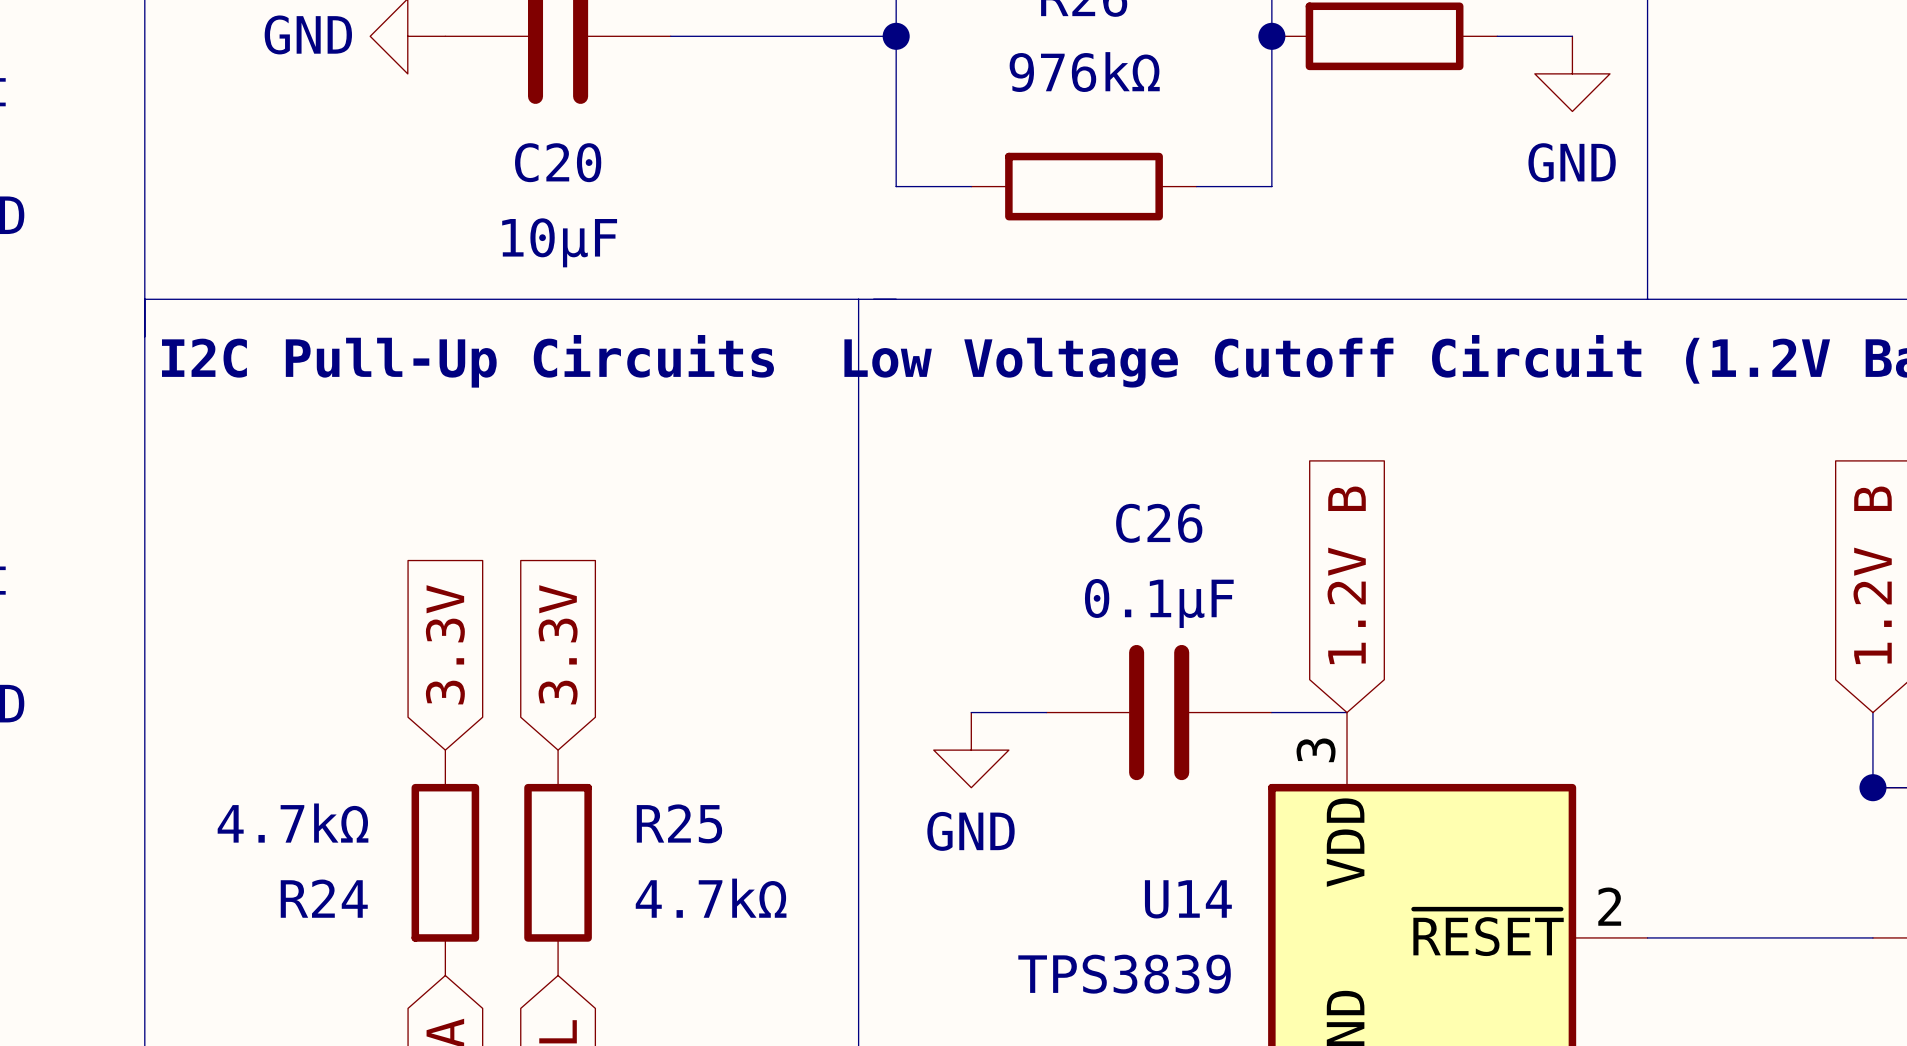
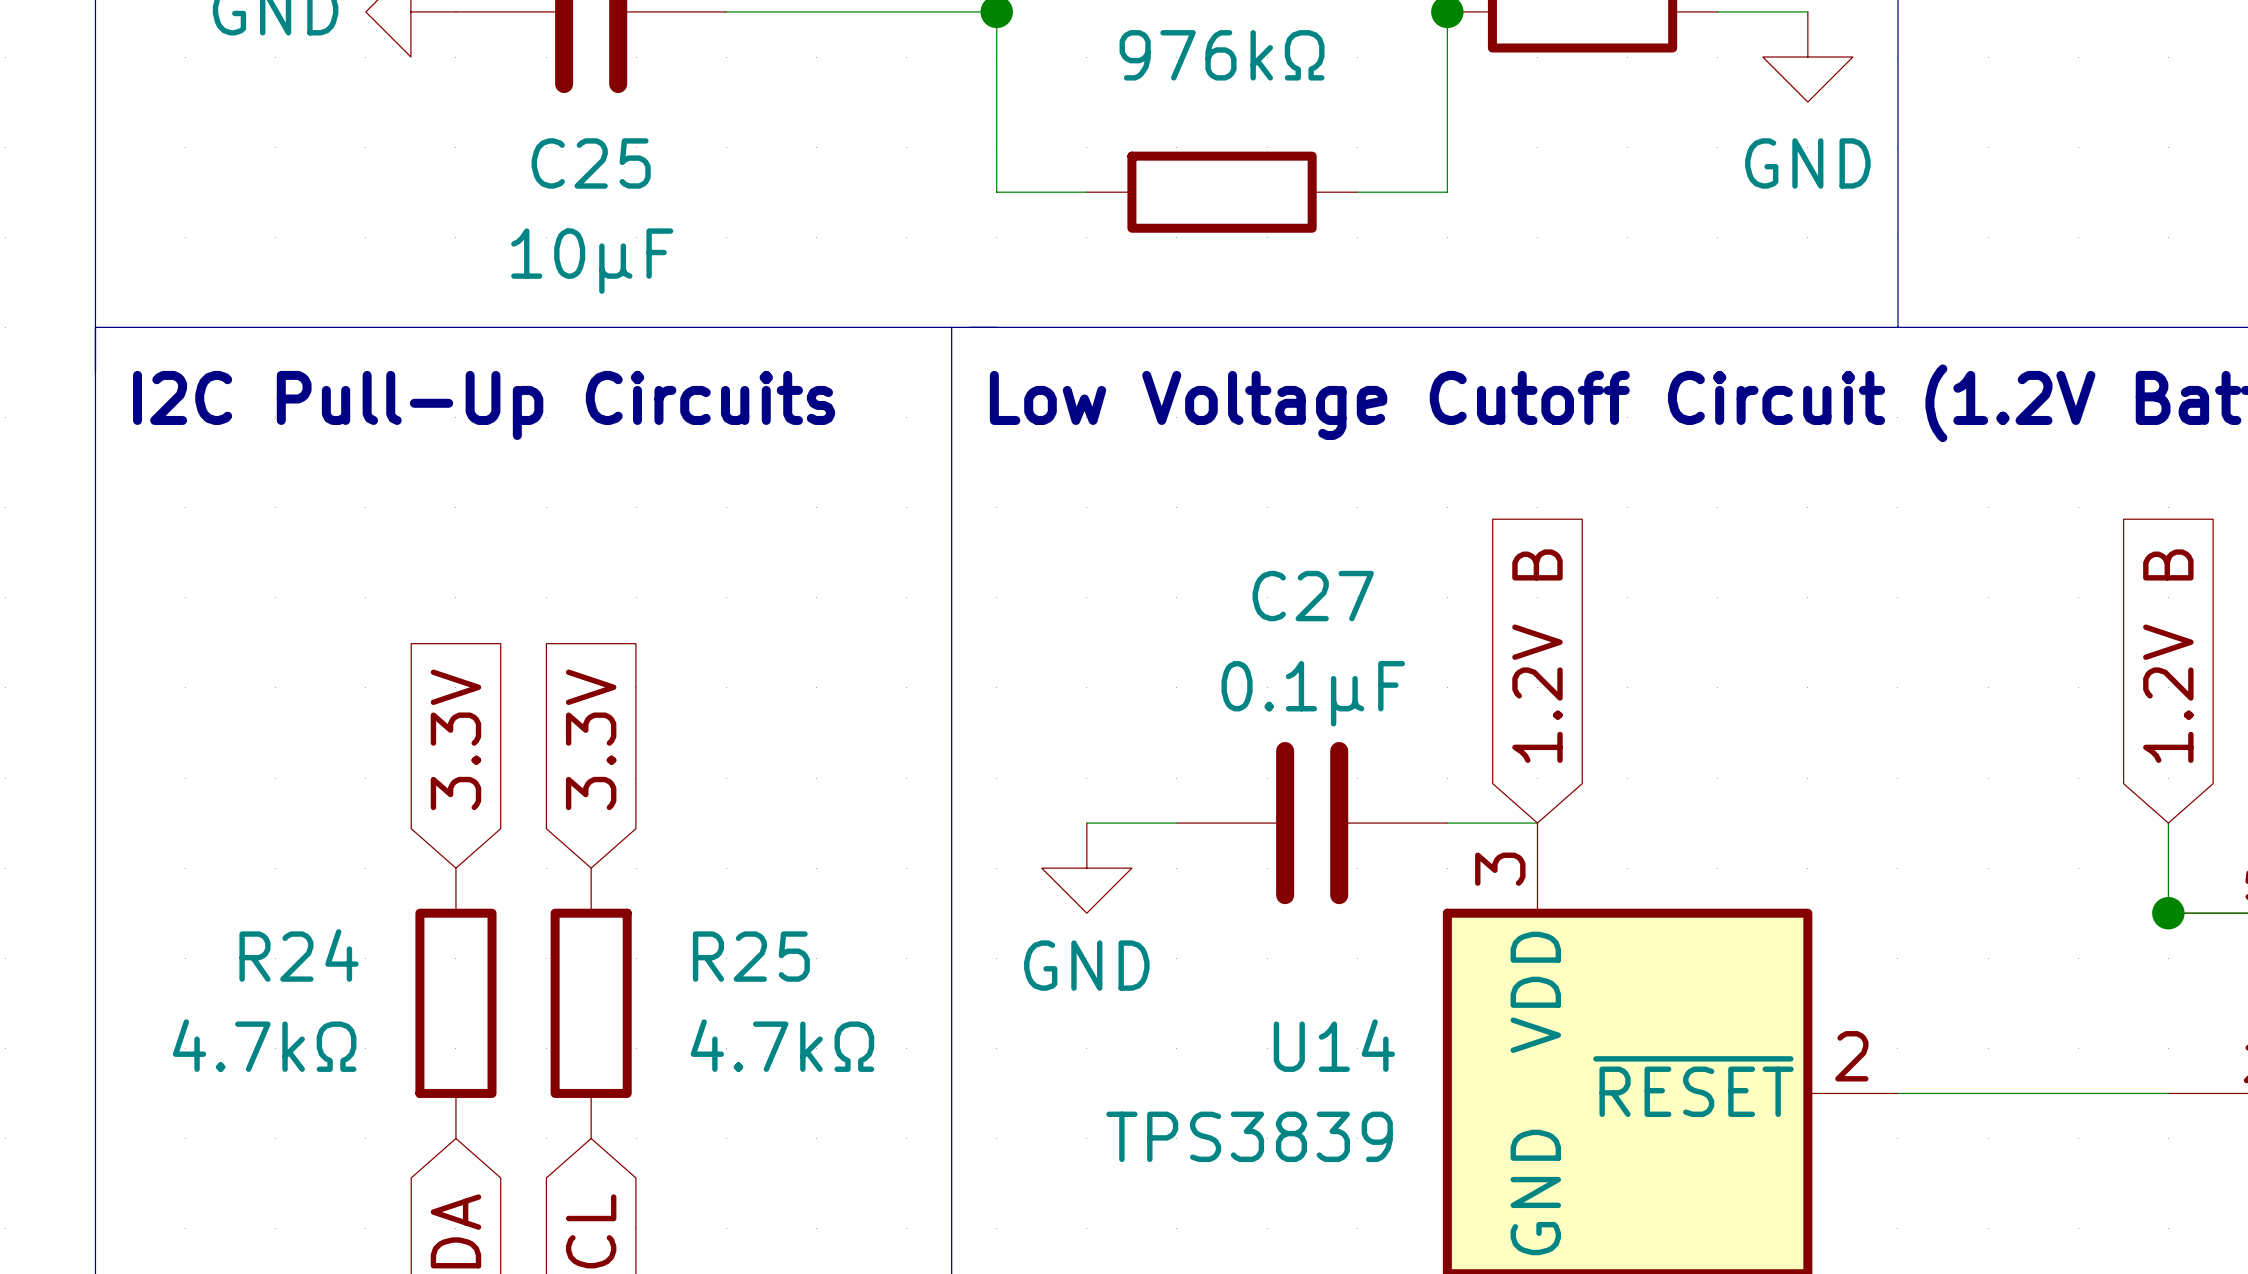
C20 name: C20 (558, 162) -> C25 (591, 163)
C26 name: C26 (1159, 523) -> C27 (1313, 596)
R24 value position: 4.7kΩ (293, 823) -> 4.7kΩ (264, 1045)
R24 name position: R24 (324, 898) -> R24 (298, 955)

